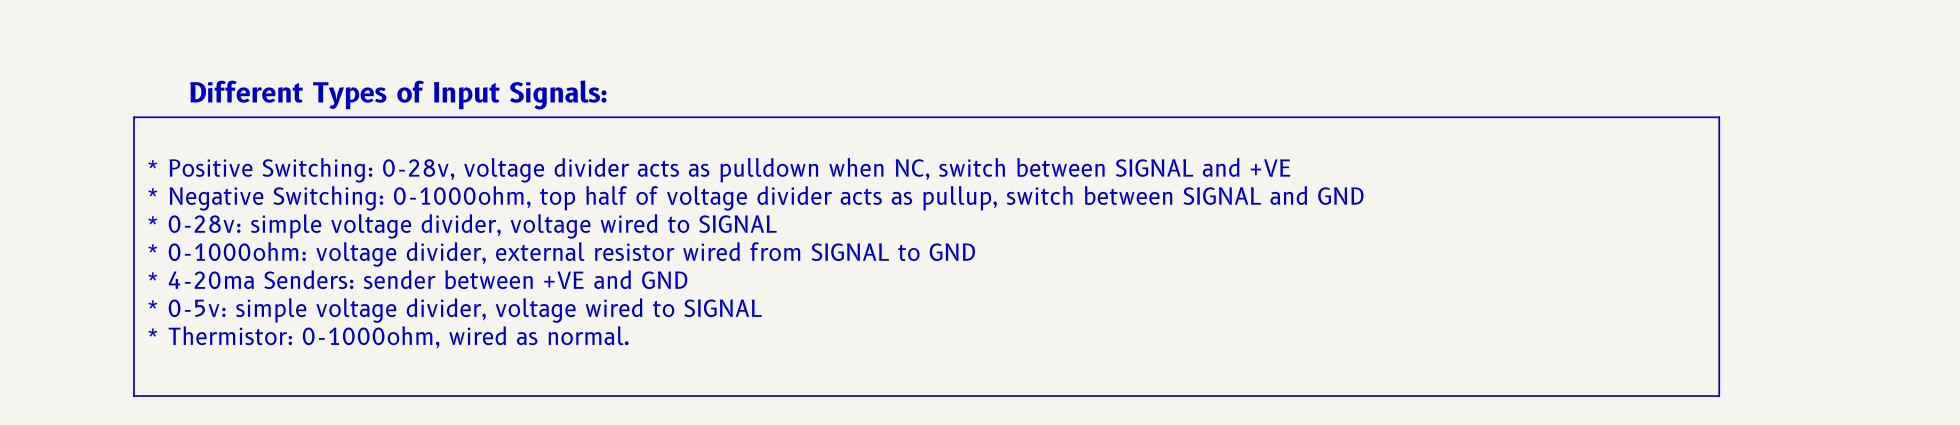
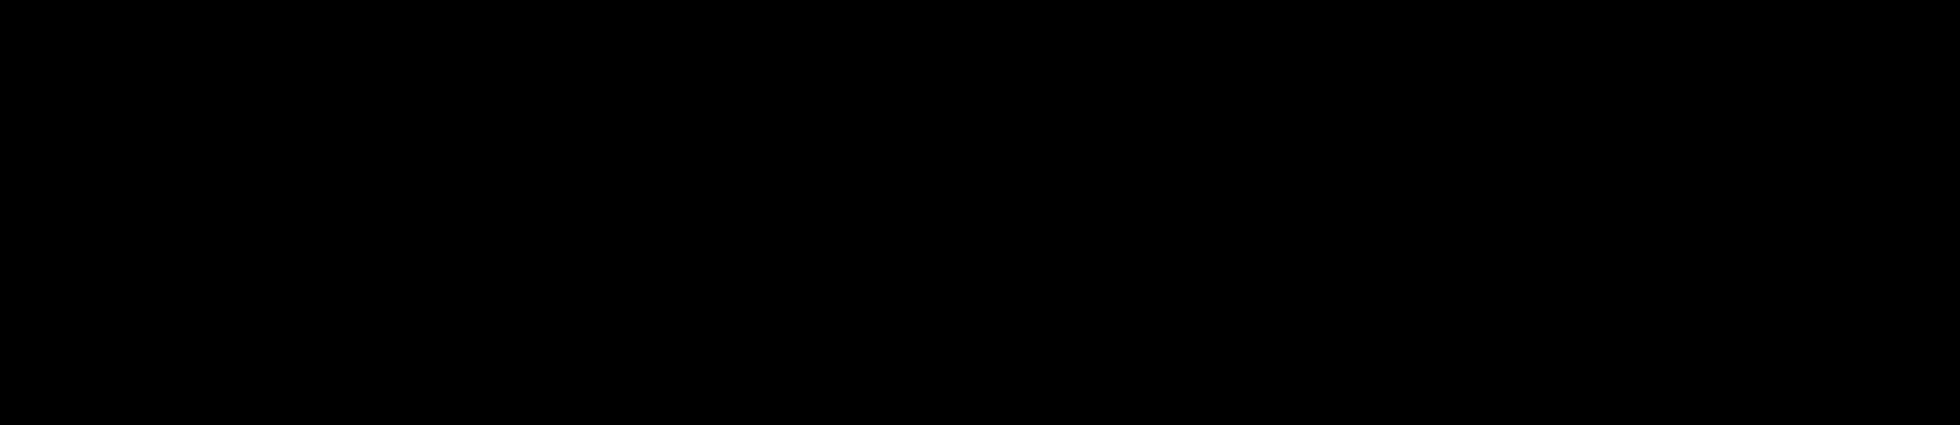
text: Different Types of Input Signals: (398, 94) -> none
line: (134, 117) (1719, 117) (1719, 396) (134, 396) (134, 117) -> none
text: * Positive Switching: 0-28v, voltage divider acts as pulldown when NC, switch between SIGNAL and +VE (719, 170) -> none
text: * Negative Switching: 0-1000ohm, top half of voltage divider acts as pullup, switch between SIGNAL and GND (756, 198) -> none
text: * 0-28v: simple voltage divider, voltage wired to SIGNAL (462, 226) -> none
text: * 0-1000ohm: voltage divider, external resistor wired from SIGNAL to GND (561, 254) -> none
text: * 4-20ma Senders: sender between +VE and GND (417, 279) -> none
text: * 0-5v: simple voltage divider, voltage wired to SIGNAL (455, 310) -> none
text: * Thermistor: 0-1000ohm, wired as normal. (388, 337) -> none

